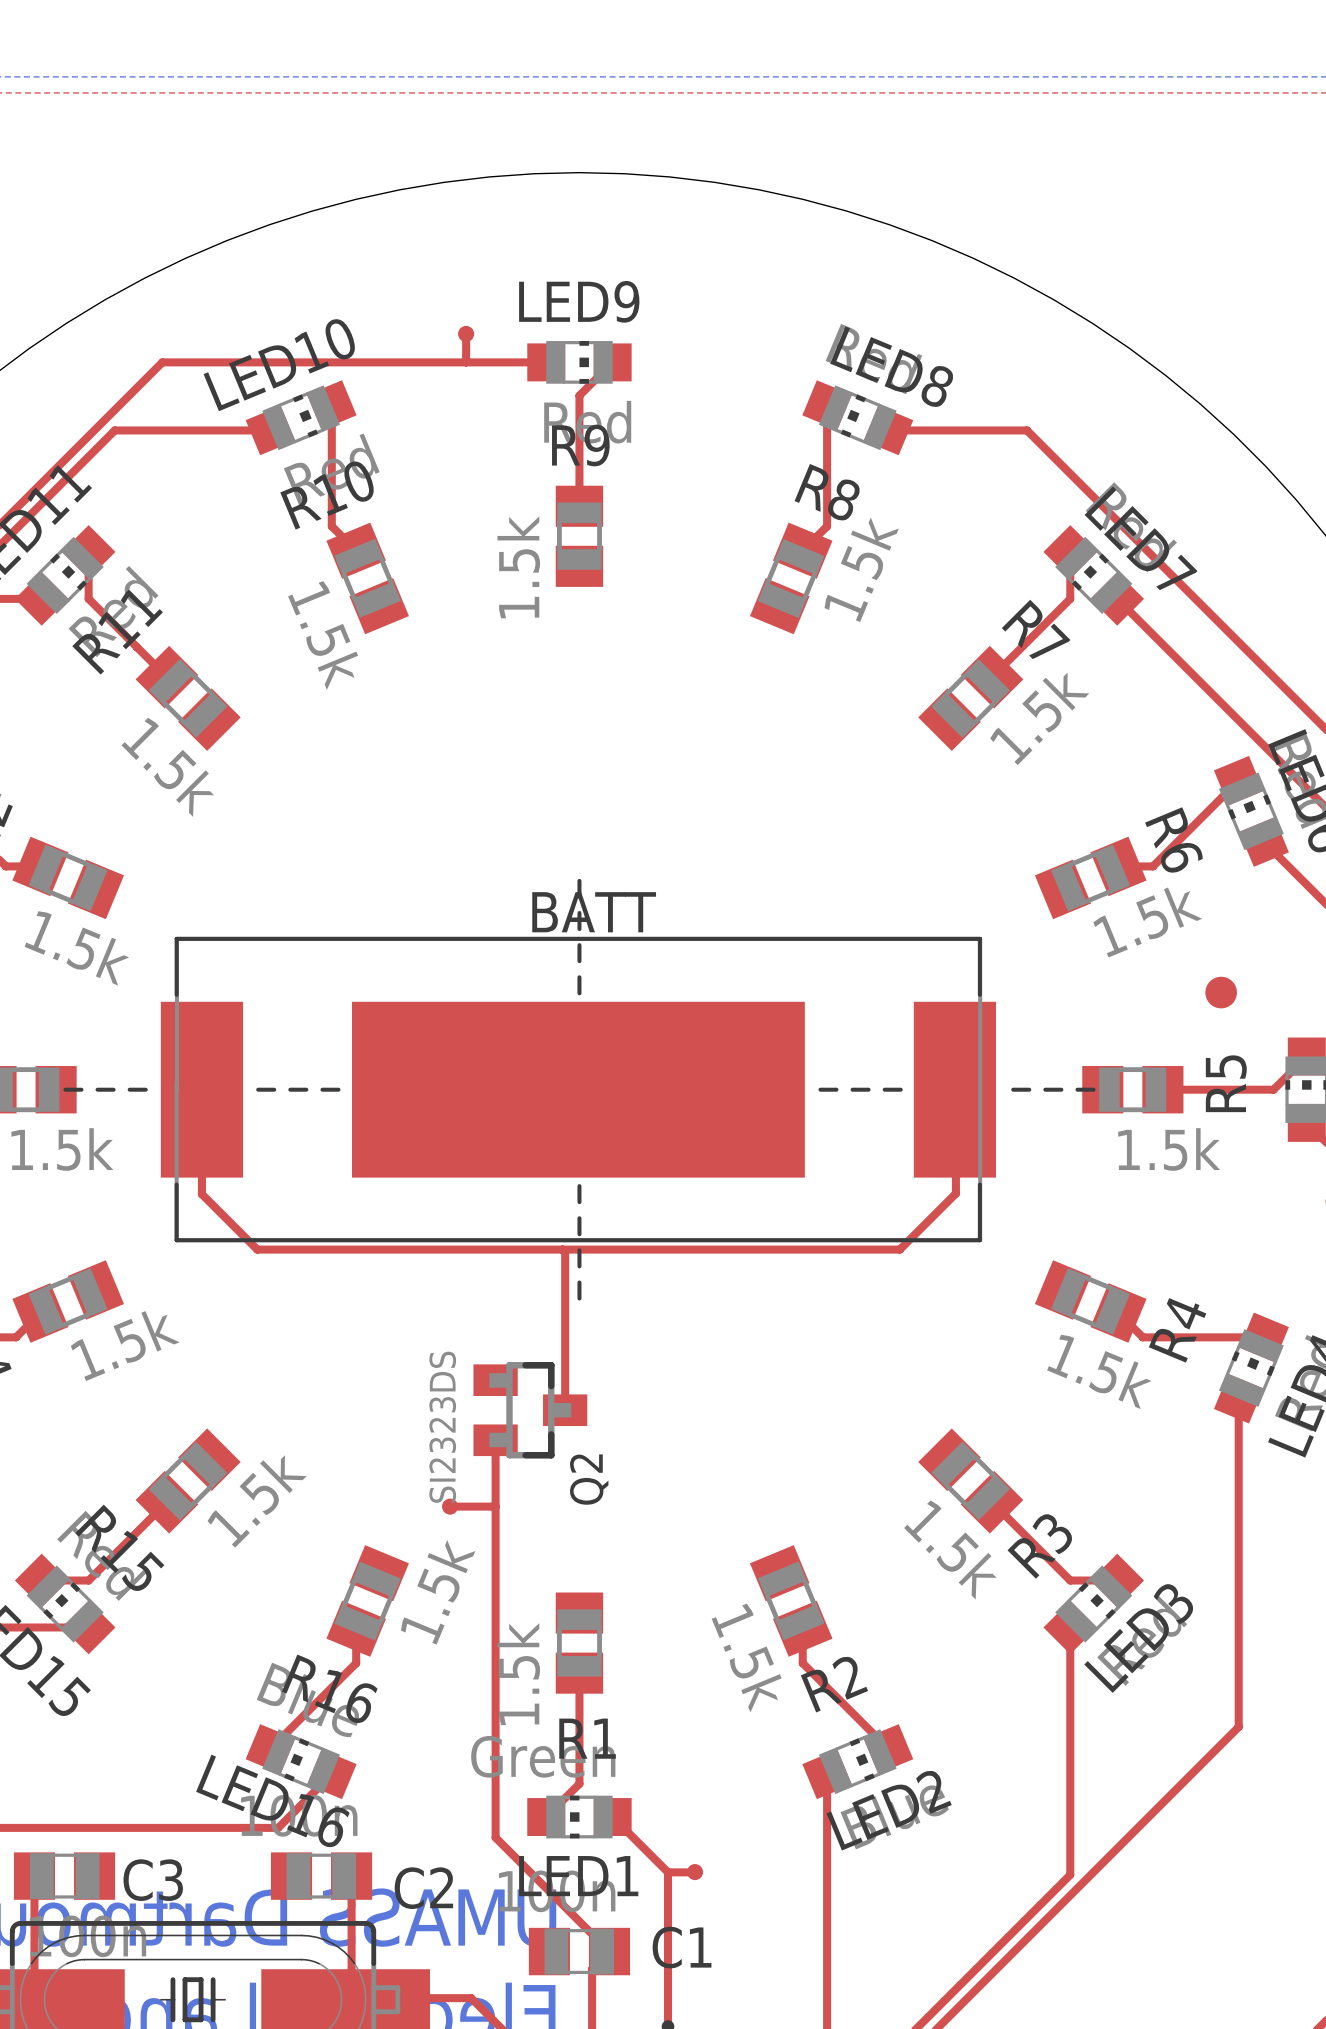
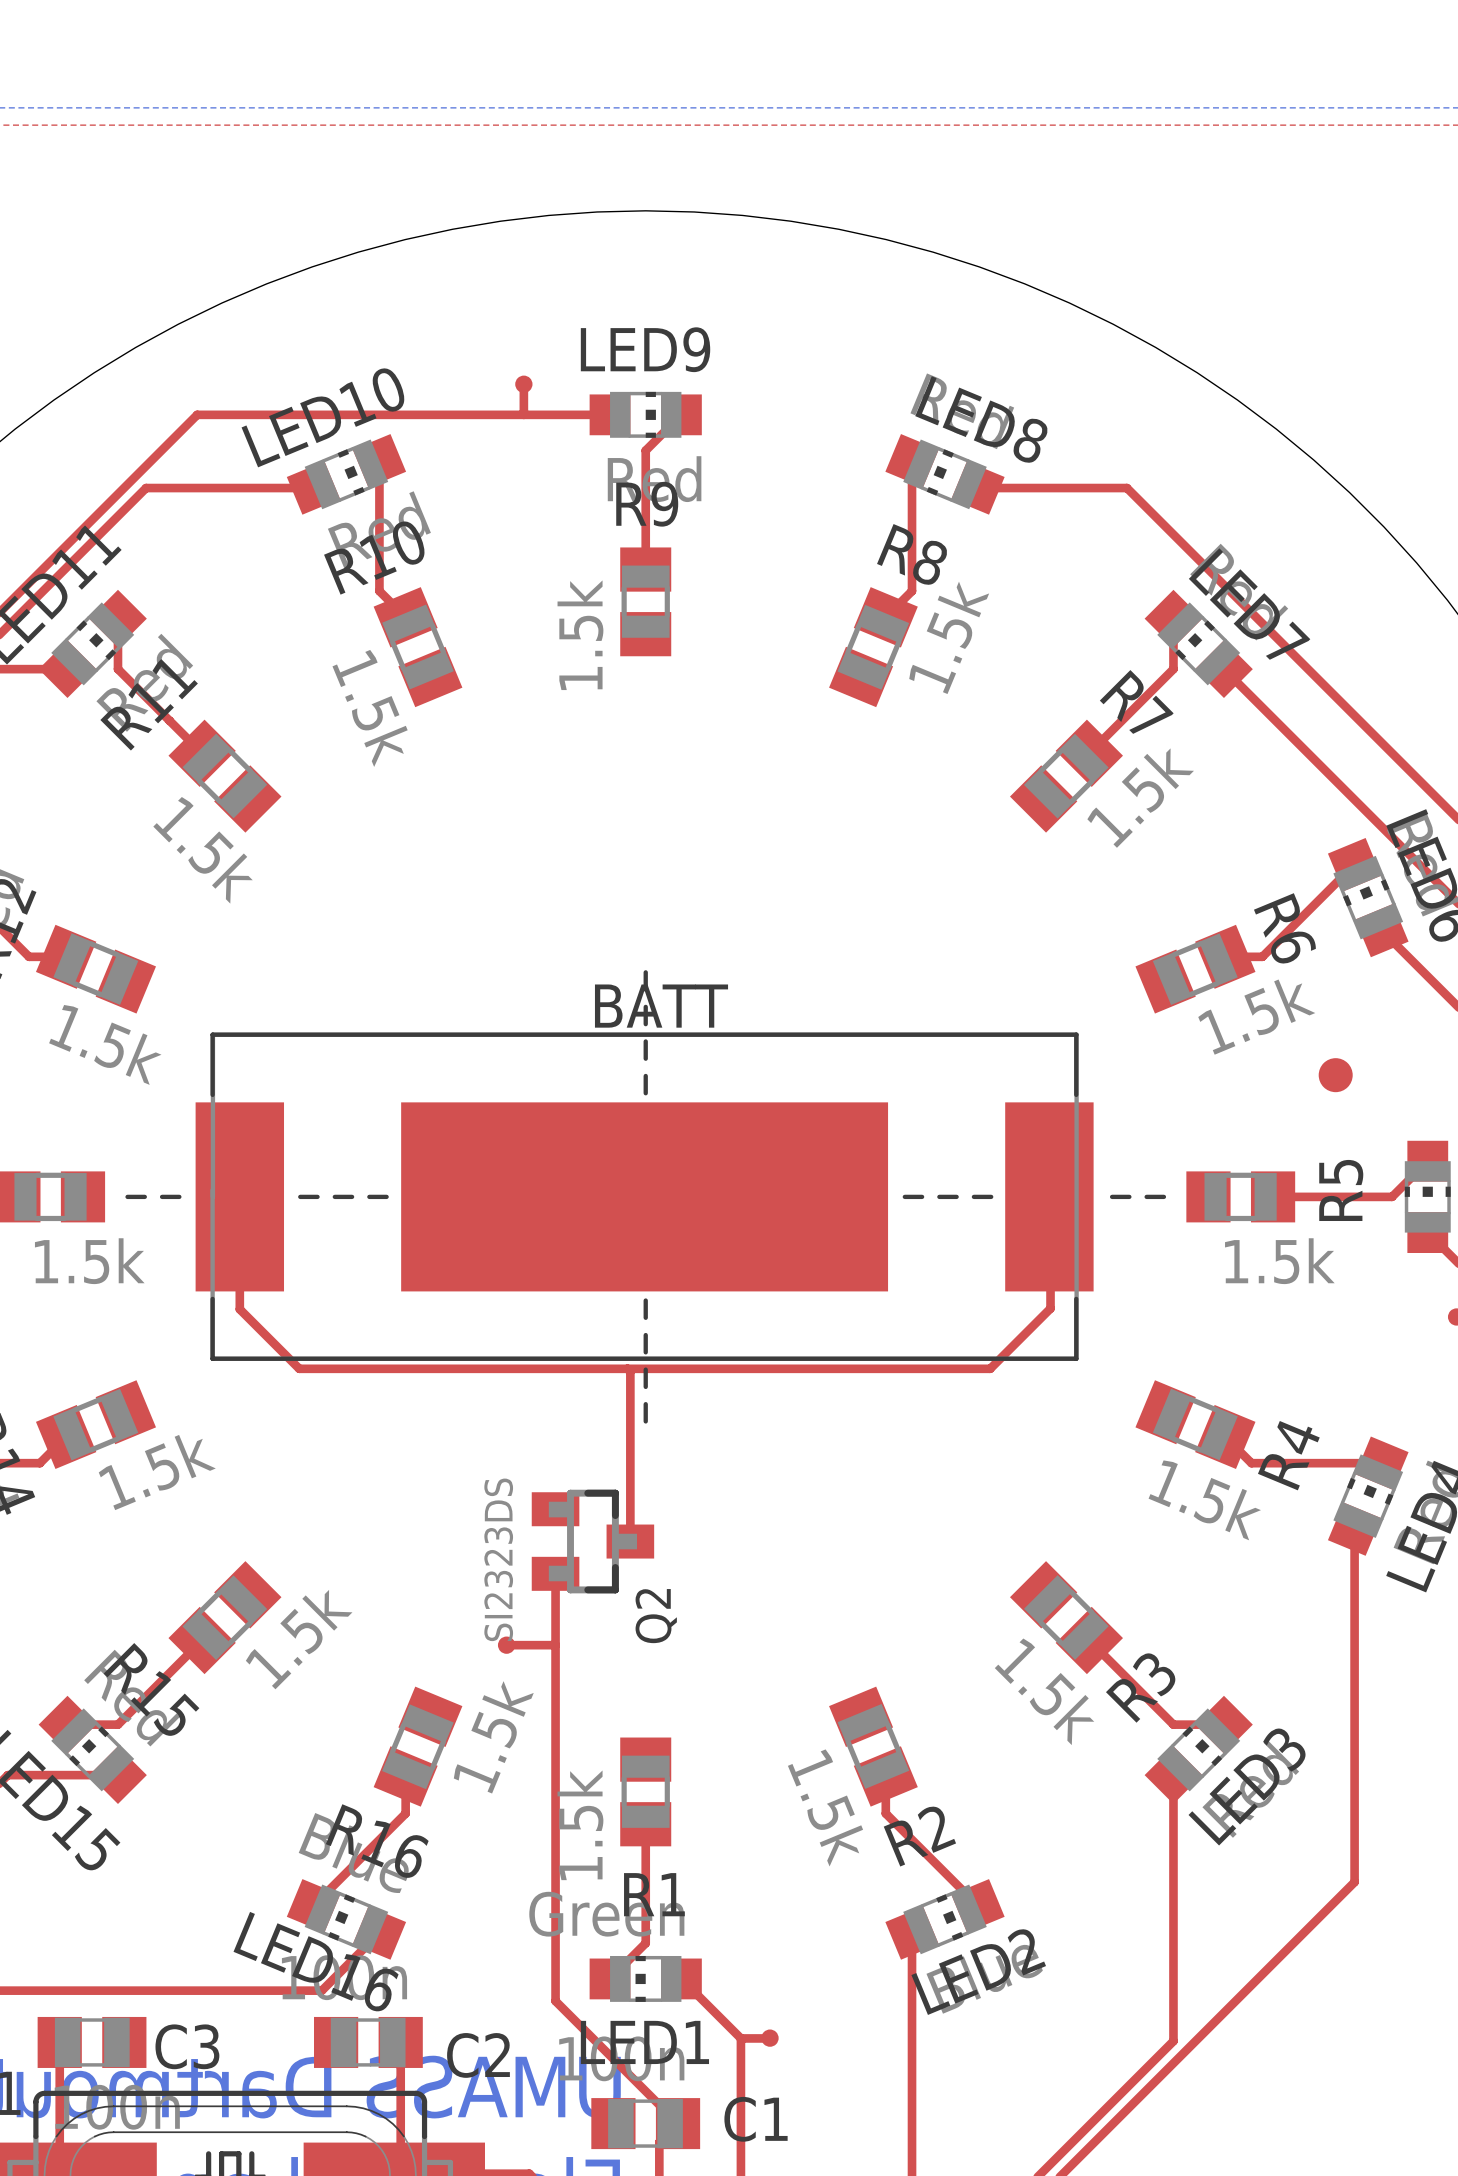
BATT footprint: [63, 878, 1096, 1301] -> [125, 970, 1167, 1424]
part position: (1221, 992) -> (1335, 1075)

